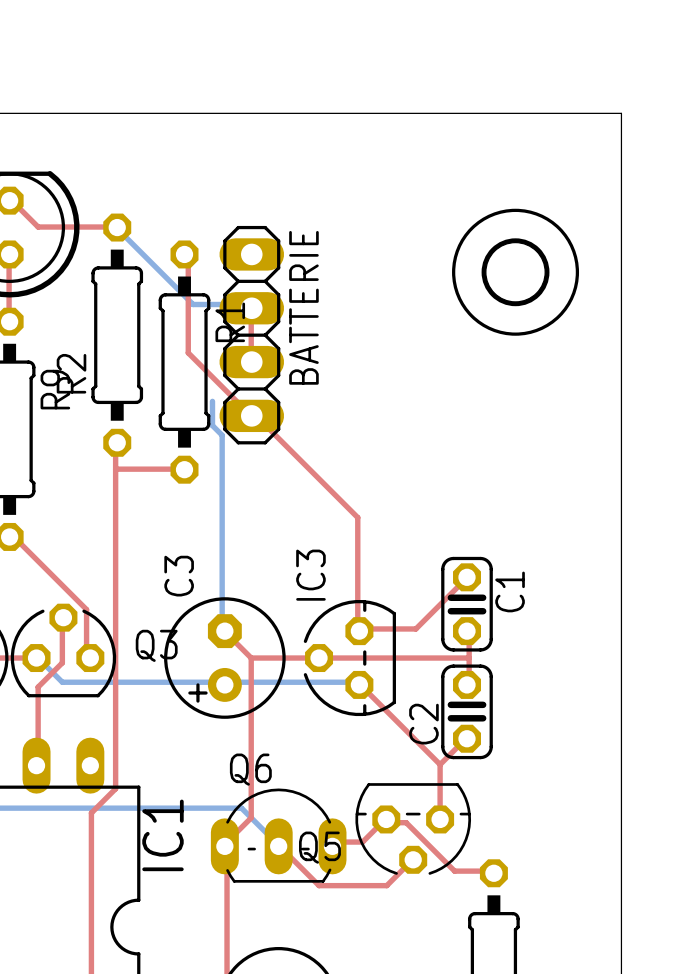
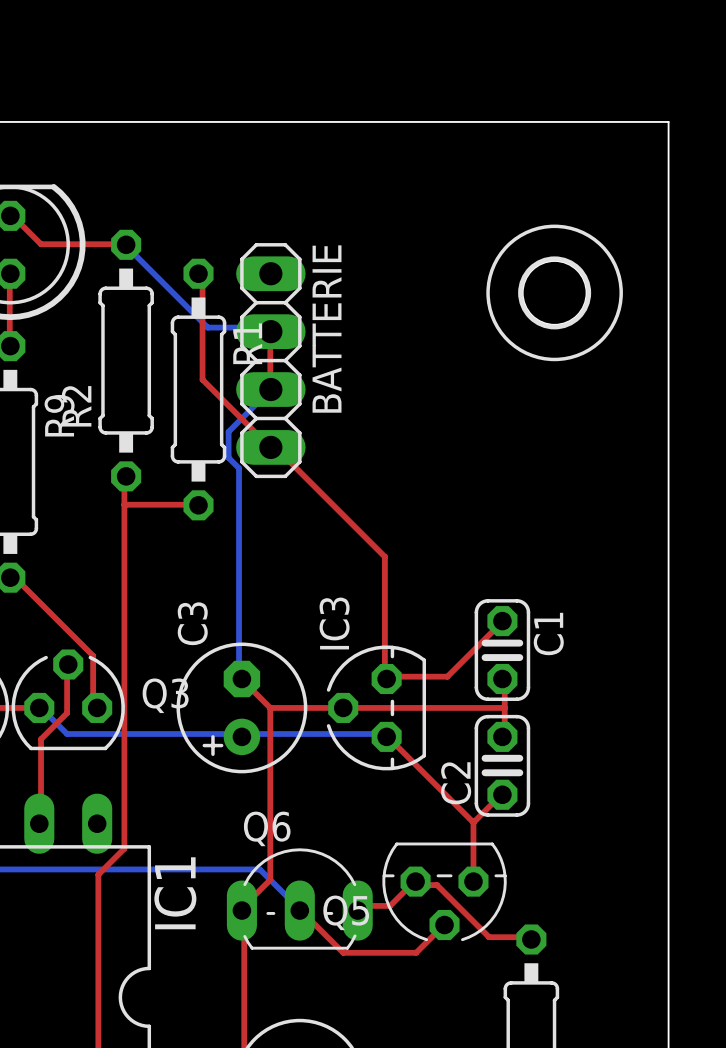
bottom track: none -> (270, 389) (228, 431)

